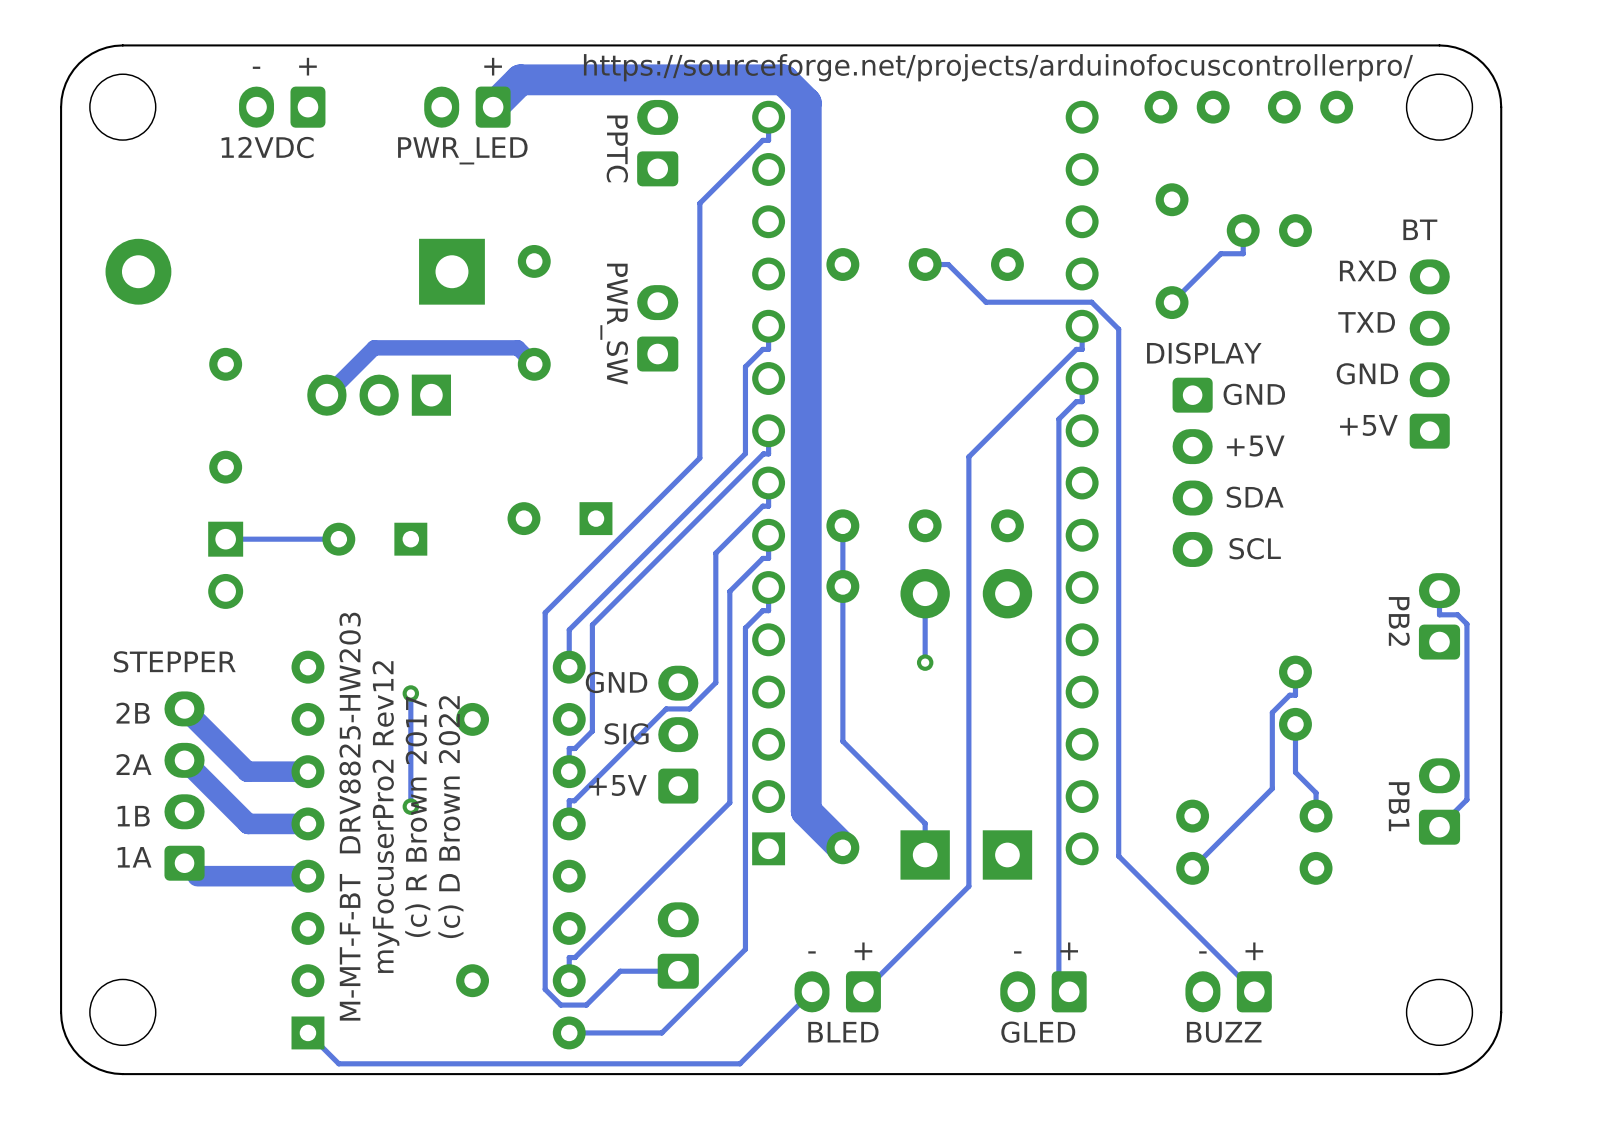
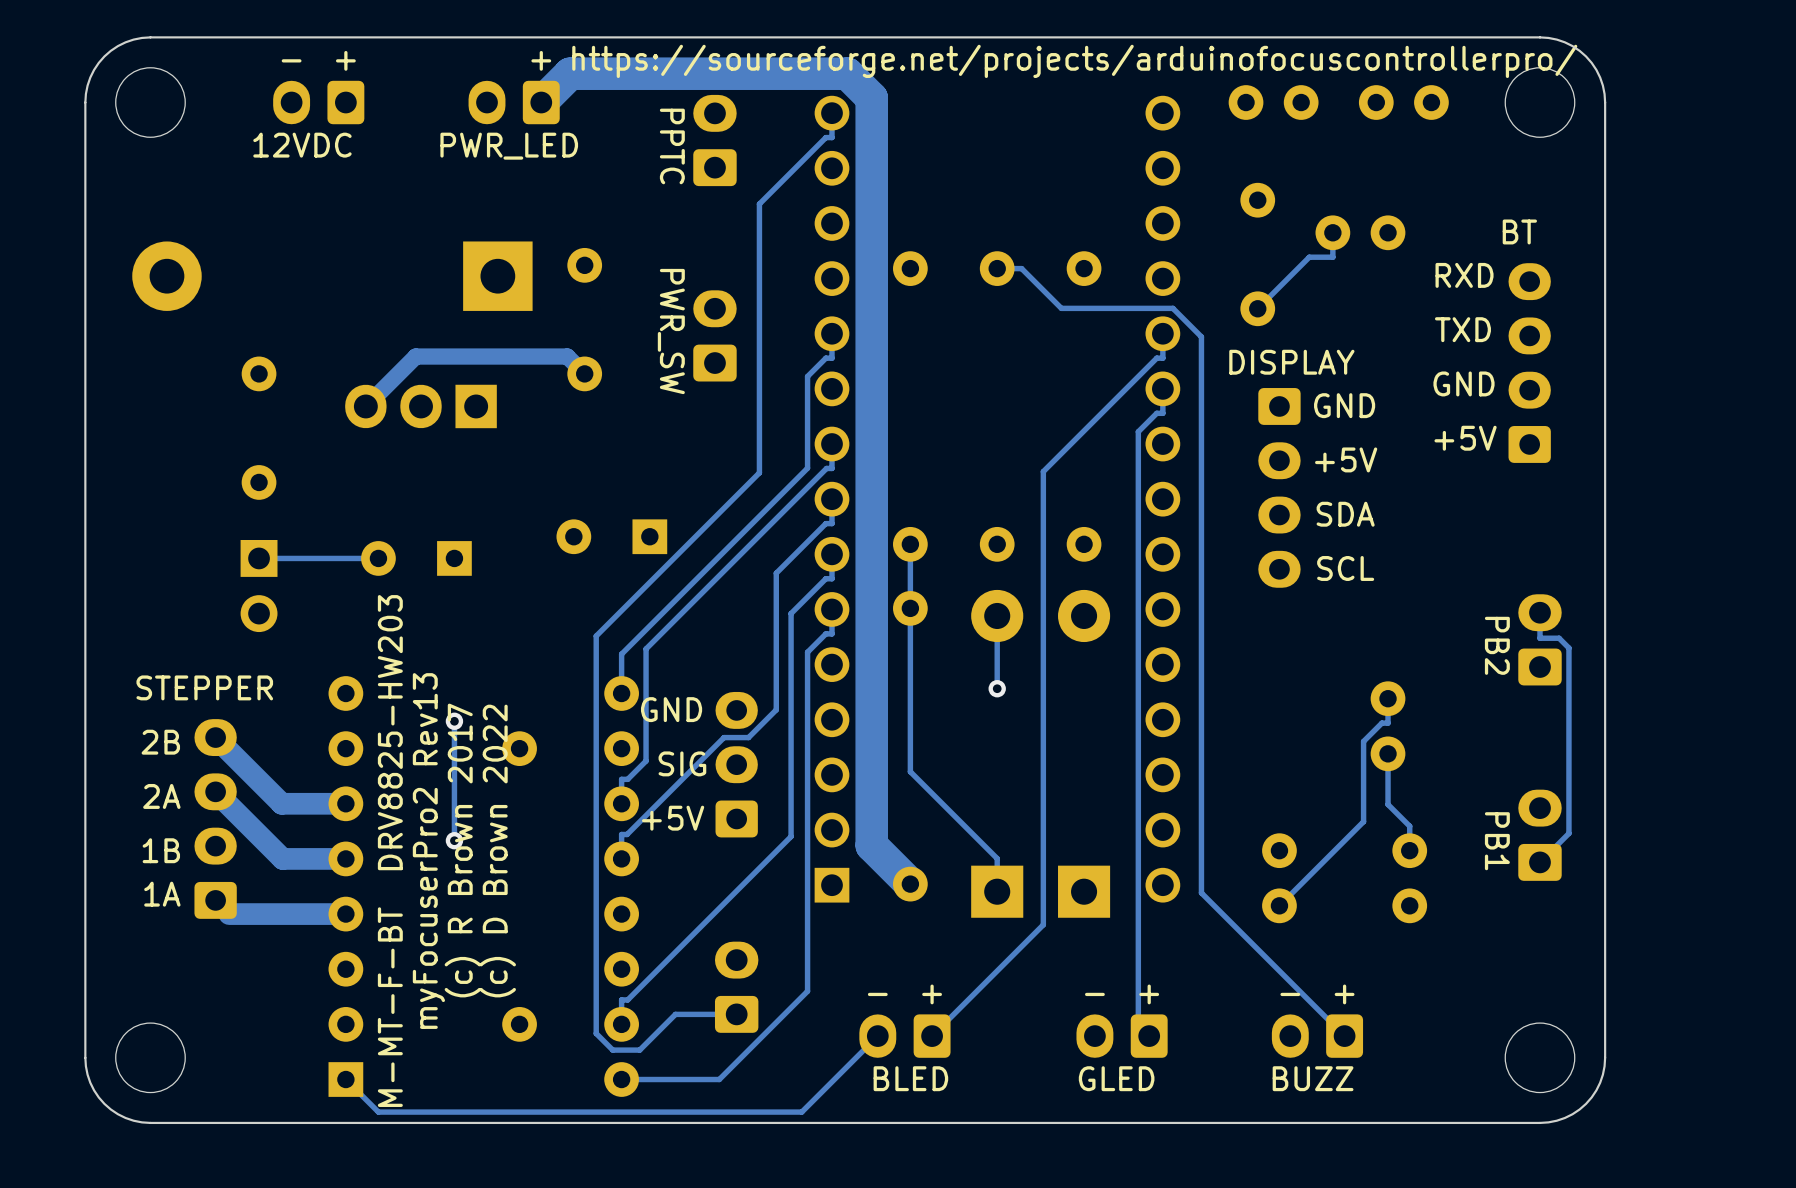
text: myFocuserPro2 Rev12 (385, 817) -> myFocuserPro2 Rev13 (428, 851)

